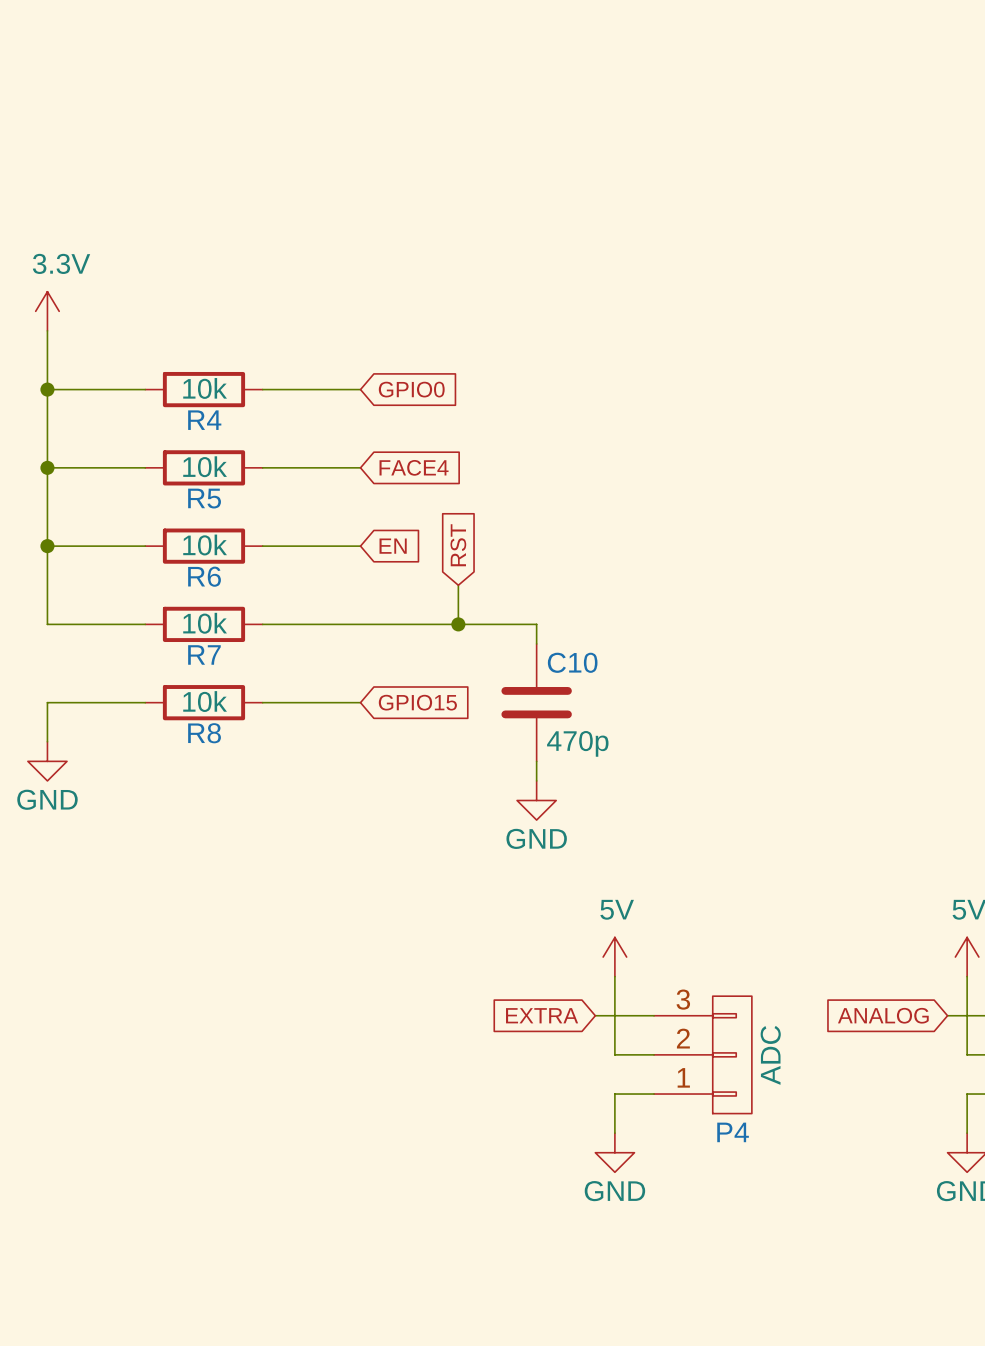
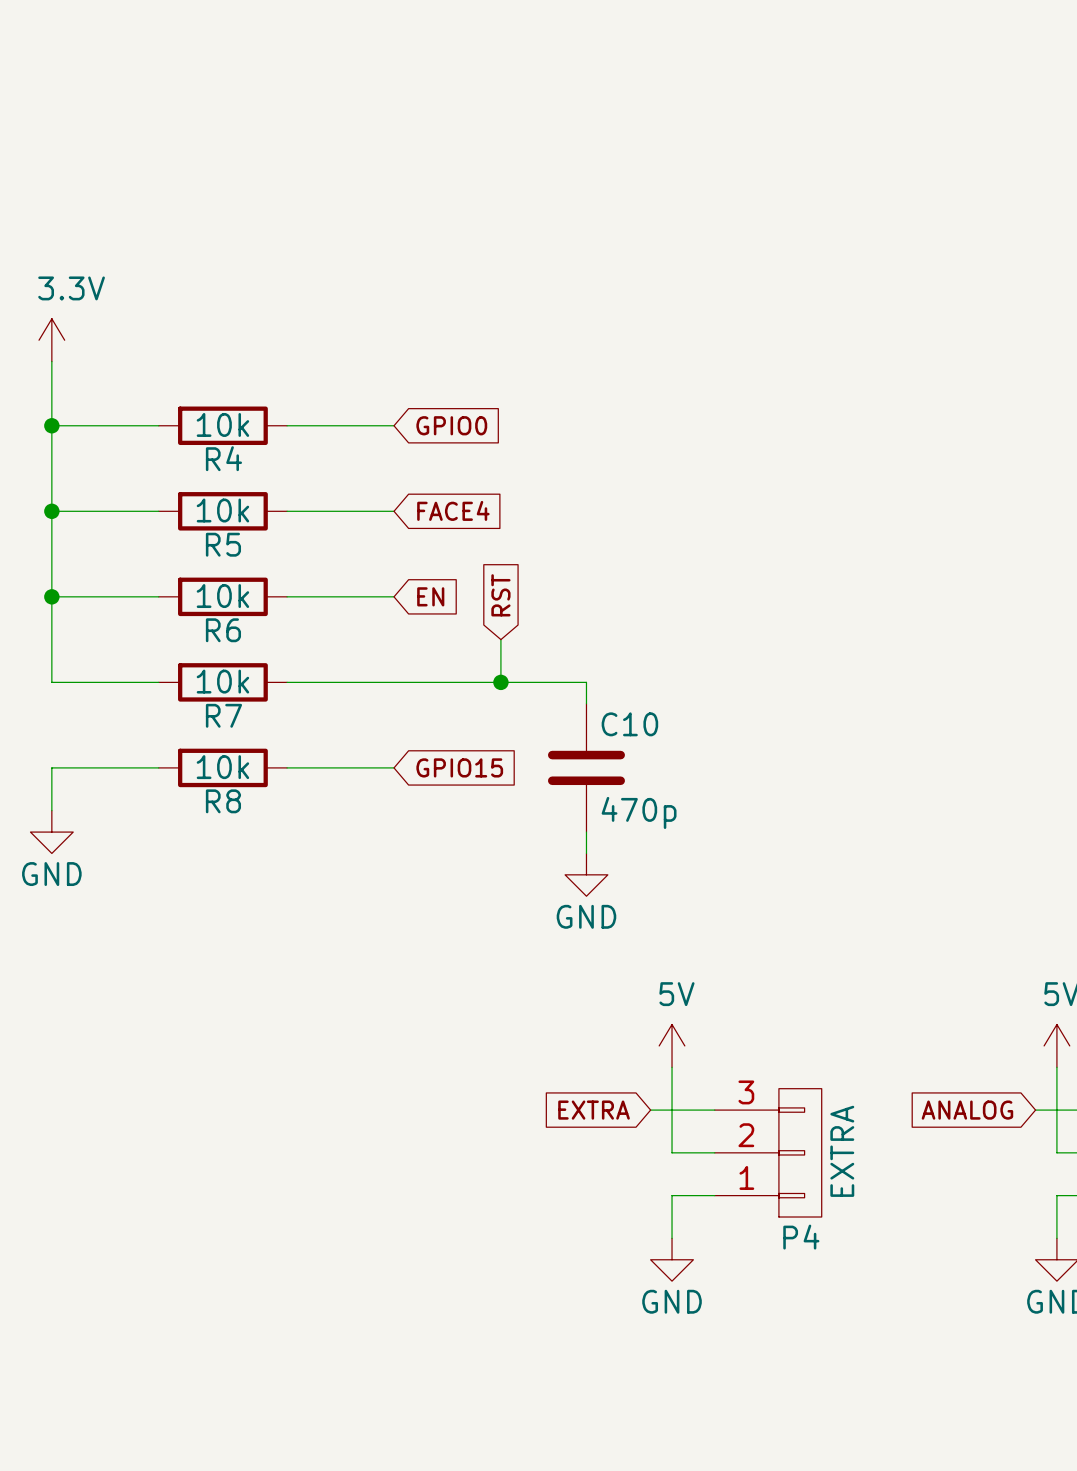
P4 value: ADC (770, 1055) -> EXTRA (842, 1151)

